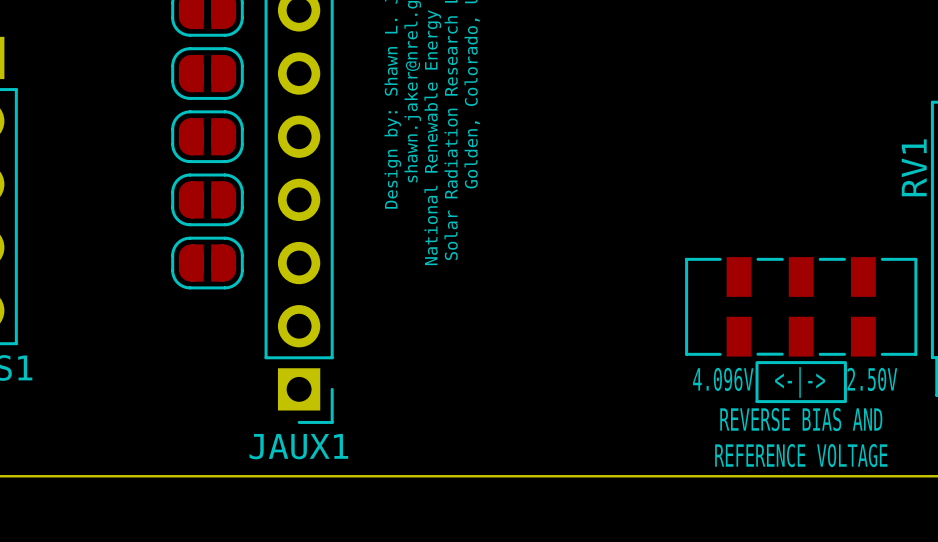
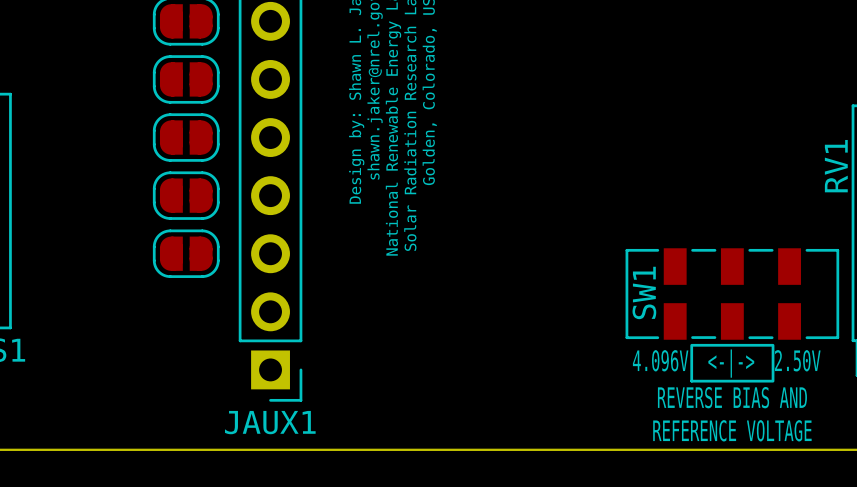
SW1 name: none -> SW1 (644, 292)

